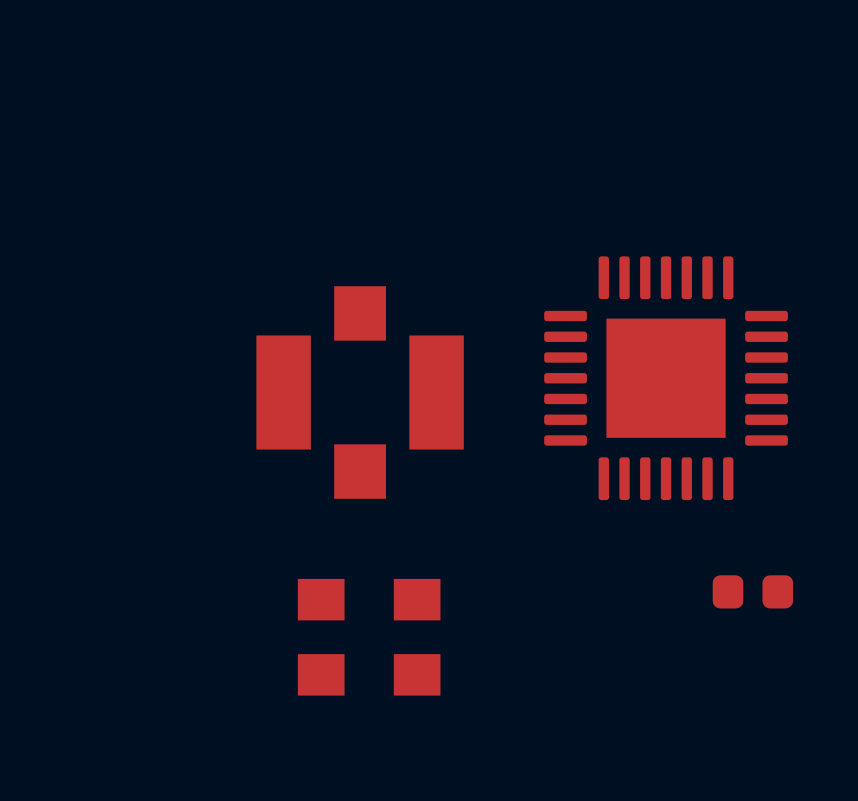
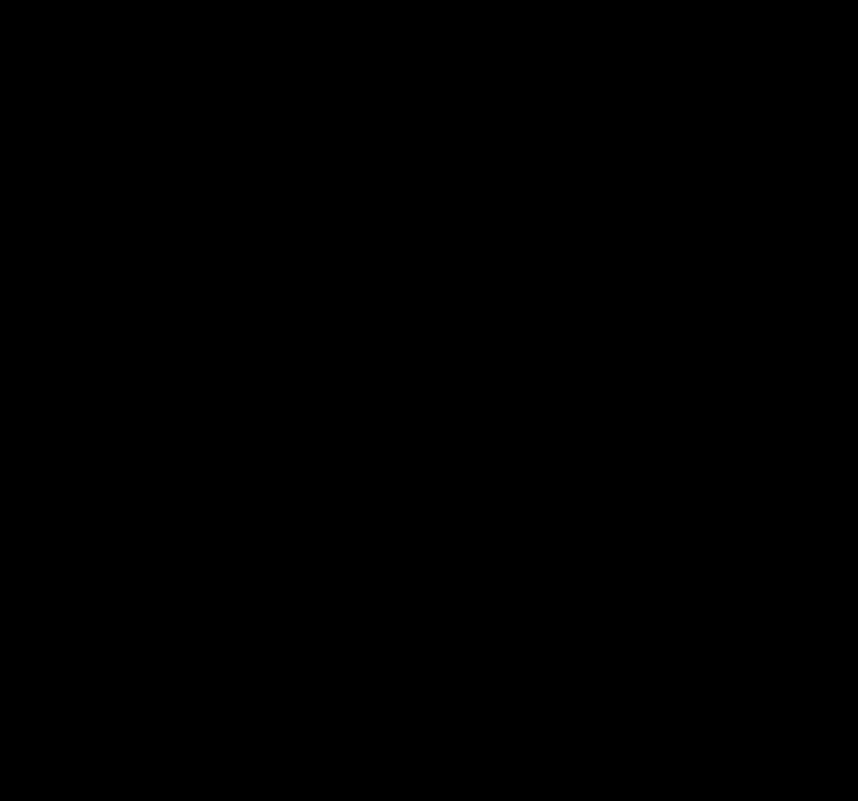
part: (666, 378) -> none
part: (360, 392) -> none
part: (752, 591) -> none
part: (369, 637) -> none

